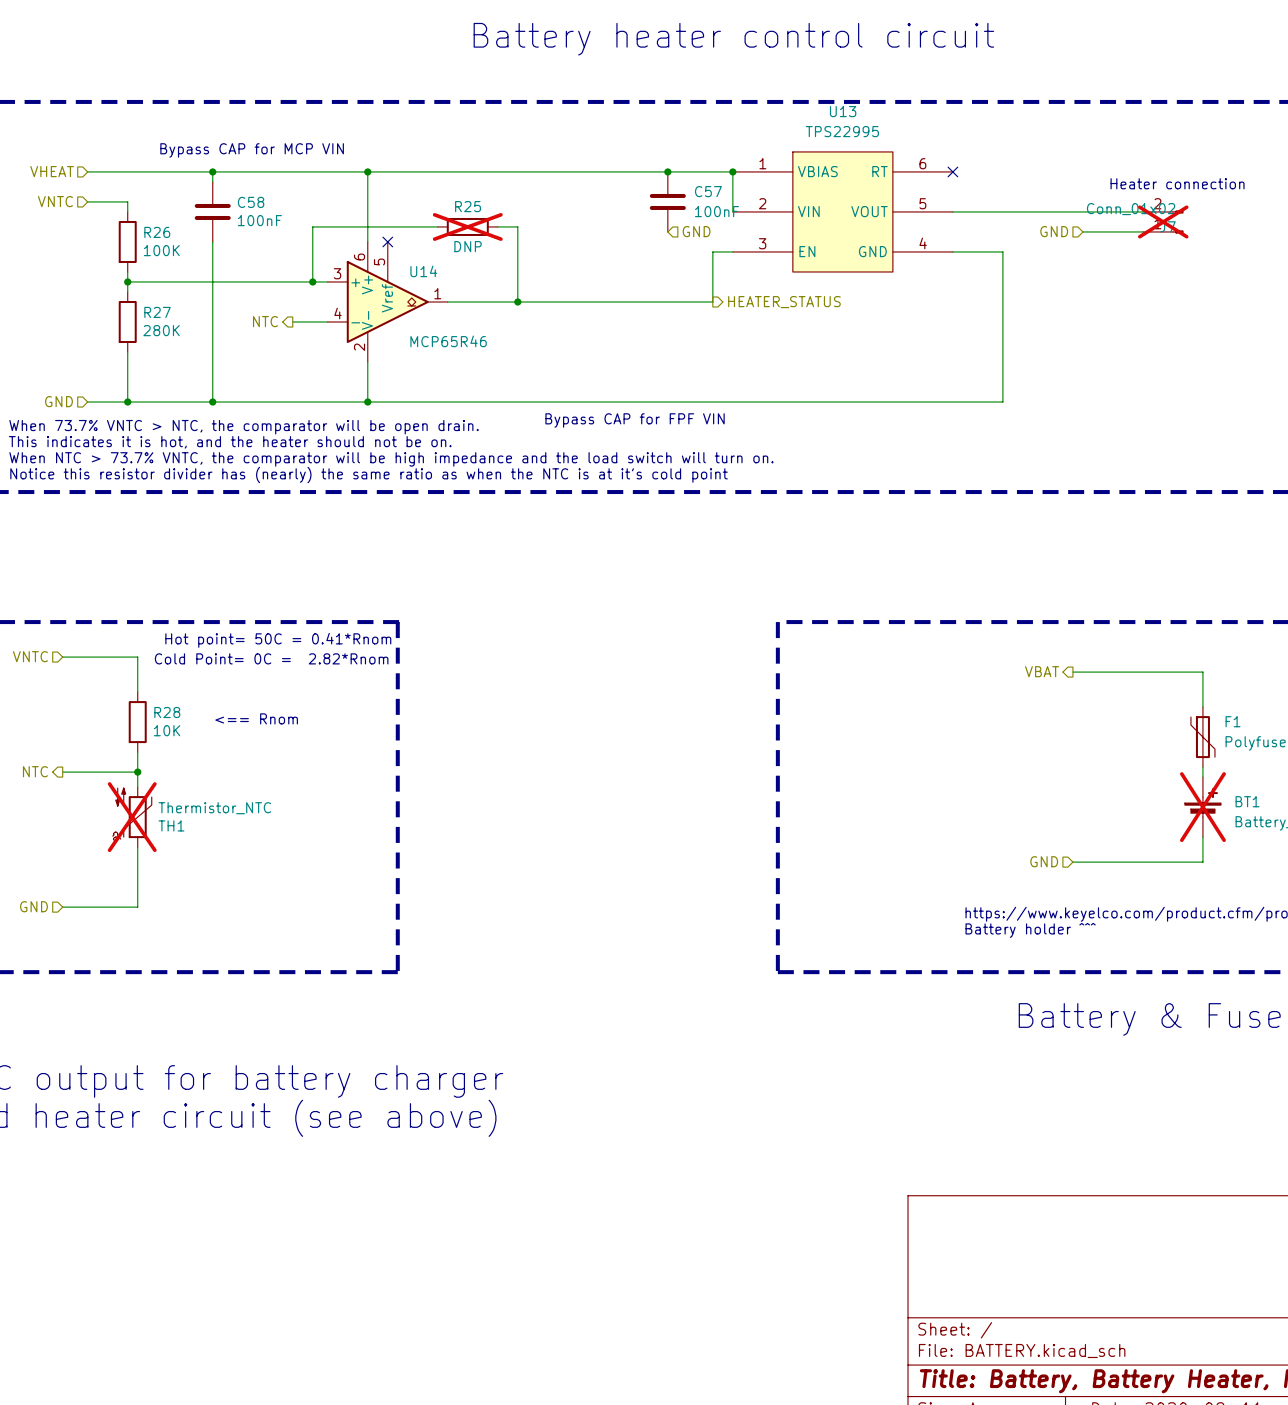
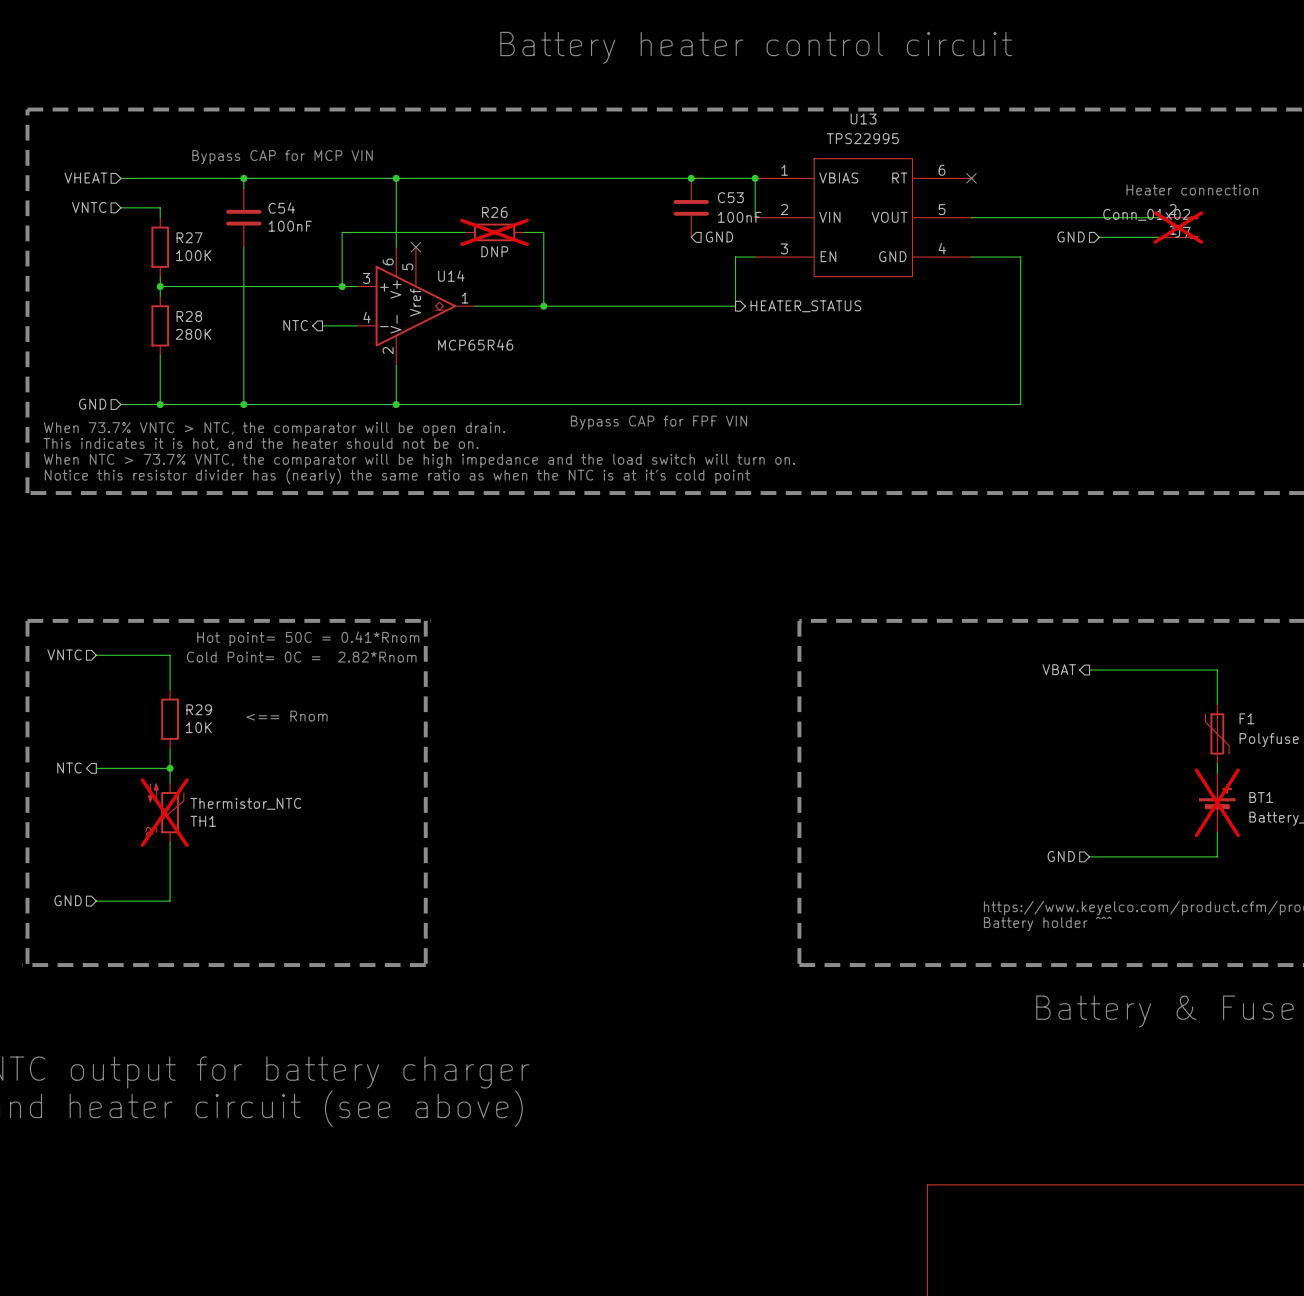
C57 name: C57 (708, 191) -> C53 (730, 197)
C58 name: C58 (251, 202) -> C54 (281, 208)
R25 name: R25 (468, 206) -> R26 (494, 212)
R26 name: R26 (157, 232) -> R27 (189, 237)
R27 name: R27 (157, 312) -> R28 (189, 316)
R28 name: R28 (167, 712) -> R29 (199, 709)

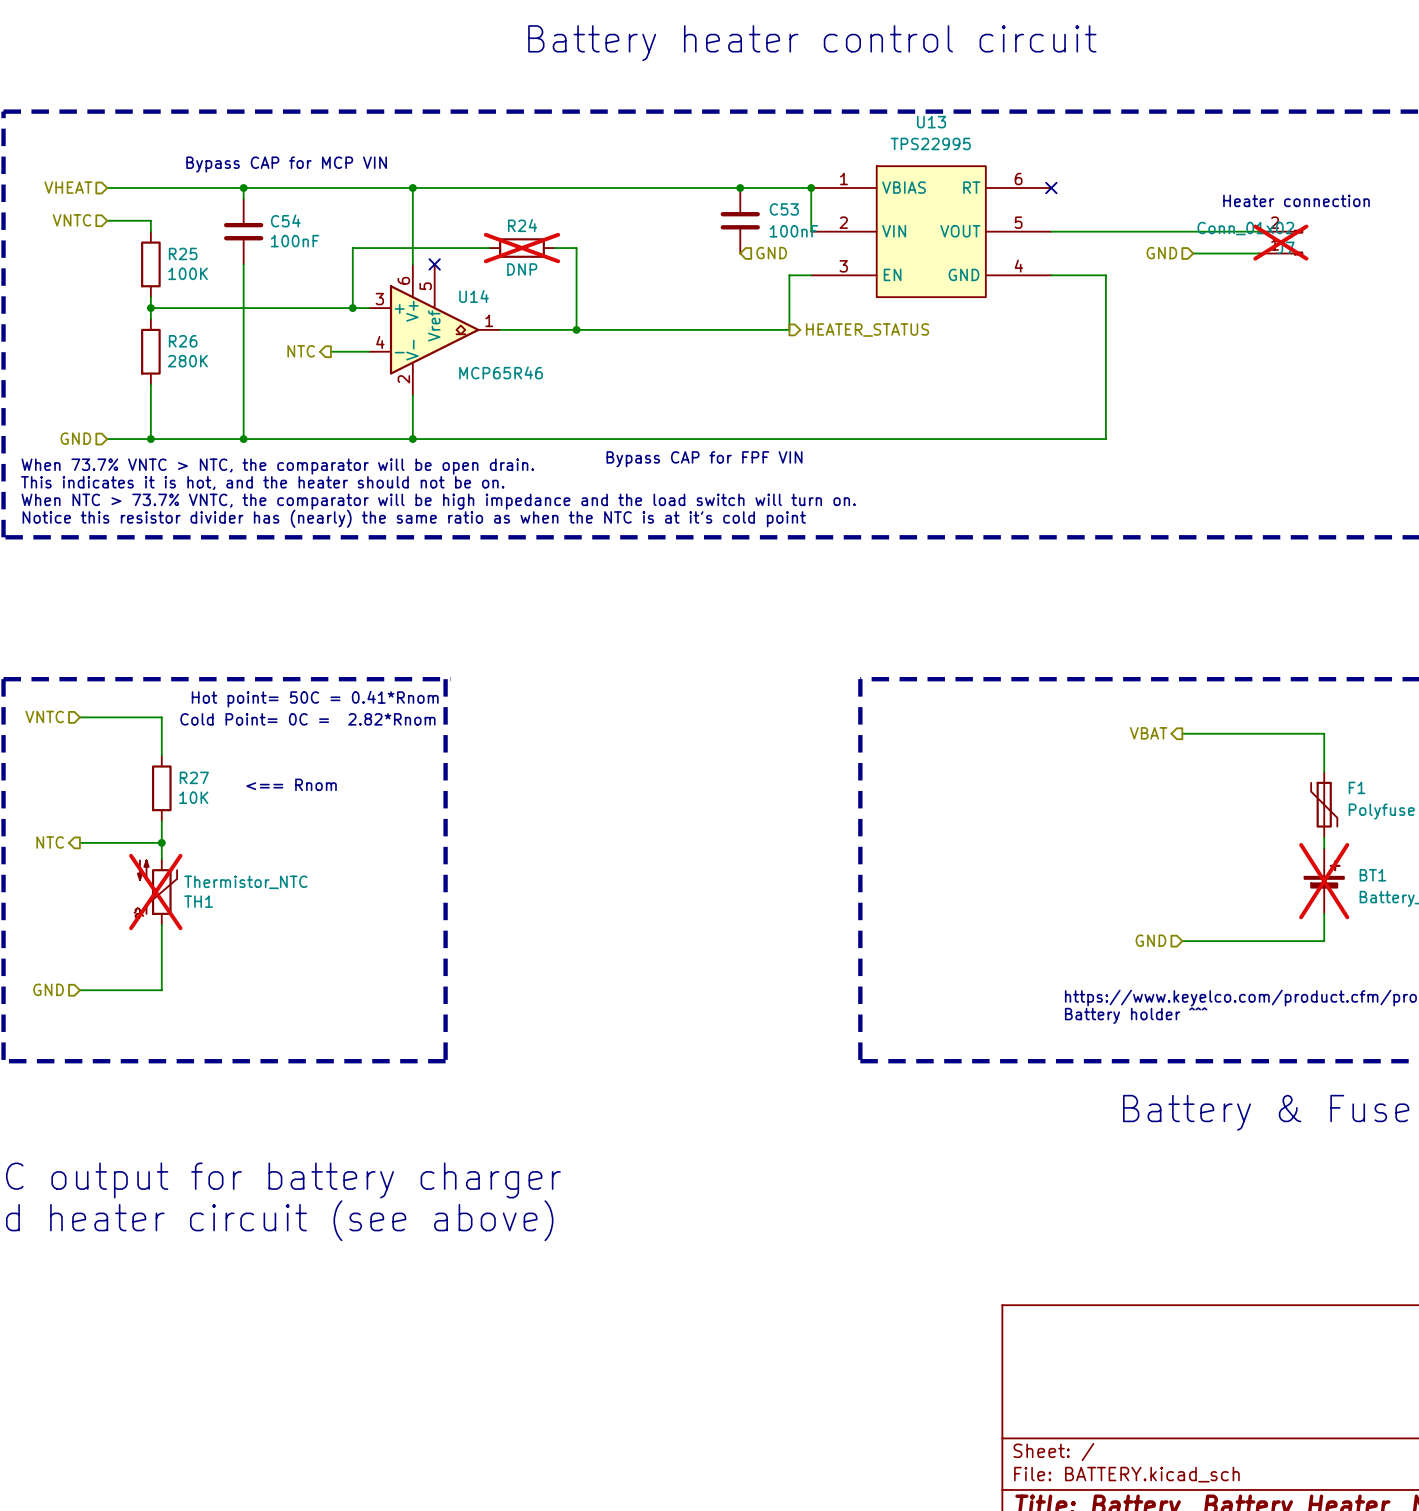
R26 name: R26 (494, 212) -> R24 (522, 225)
R27 name: R27 (189, 237) -> R25 (183, 253)
R28 name: R28 (189, 316) -> R26 (183, 341)
R29 name: R29 (199, 709) -> R27 (194, 777)

